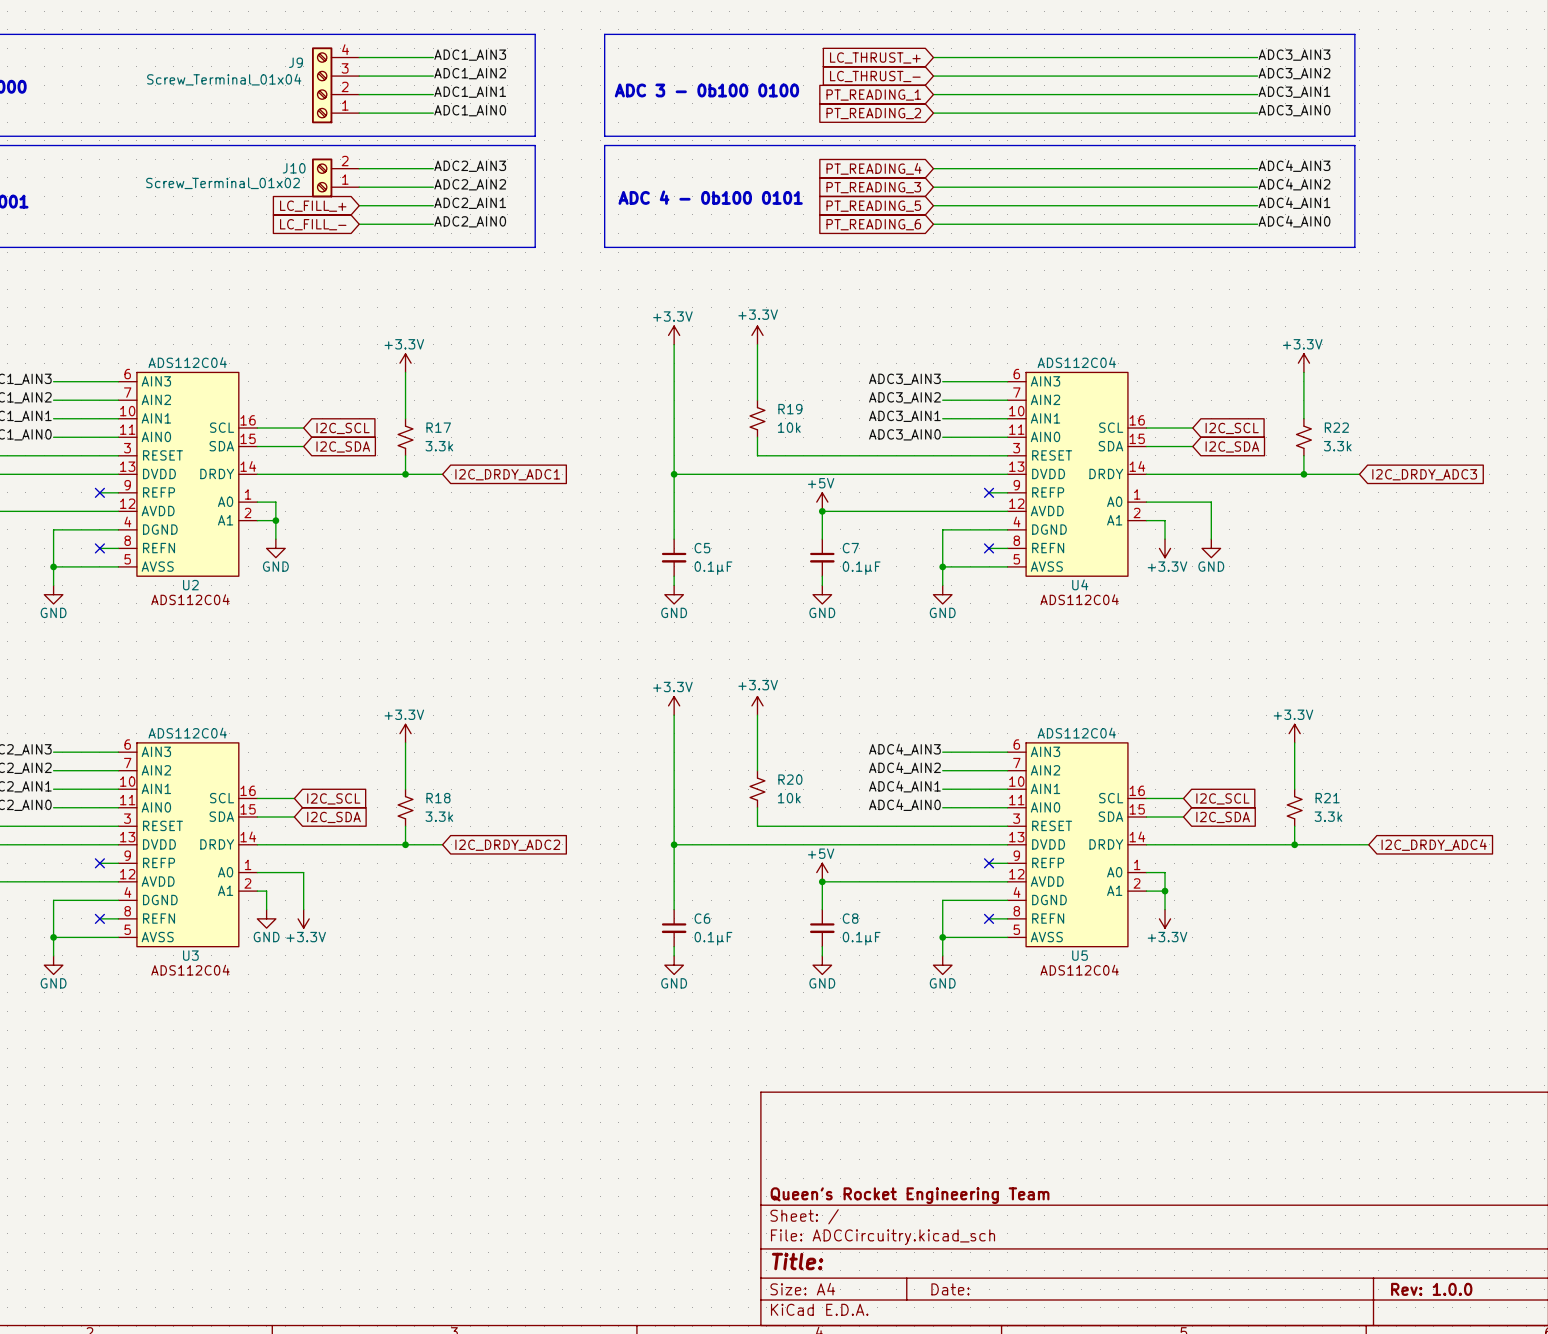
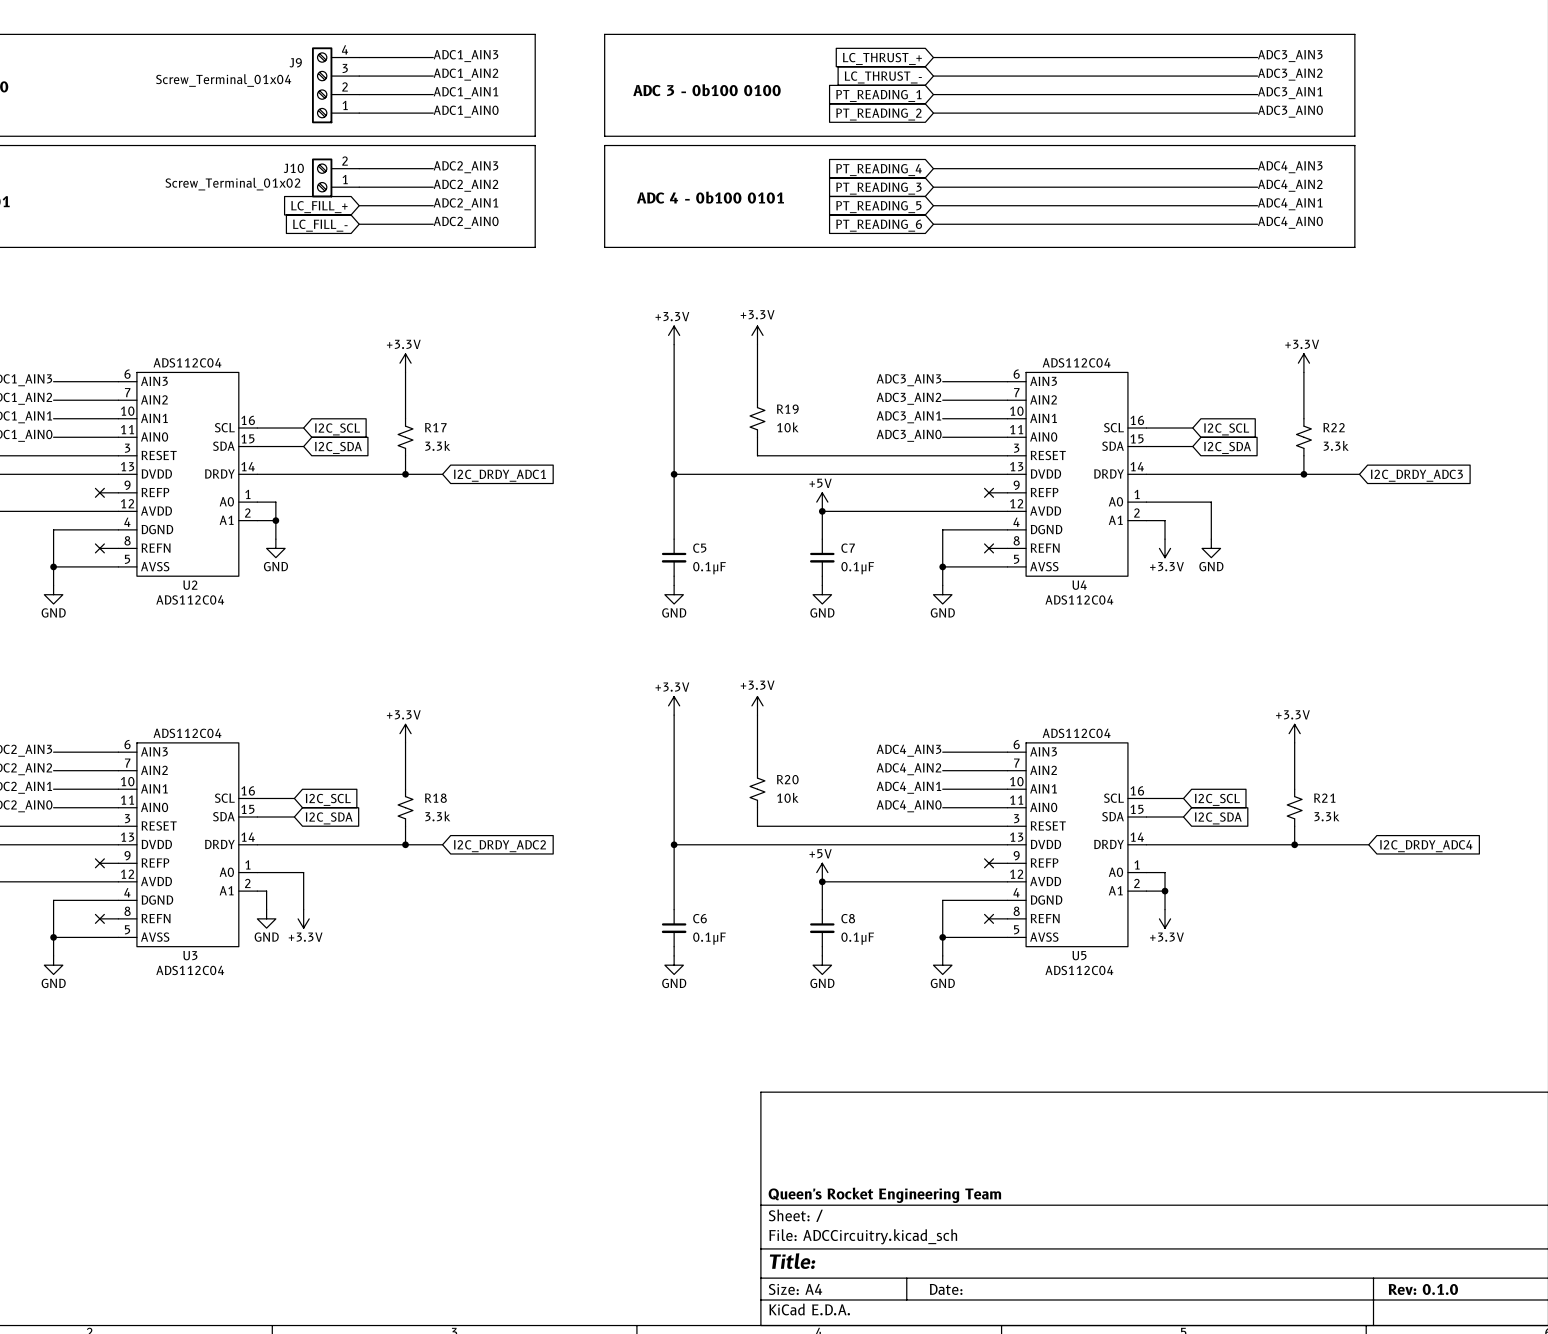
title block: Rev: 1.0.0 (1431, 1289) -> Rev: 0.1.0 (1423, 1289)

